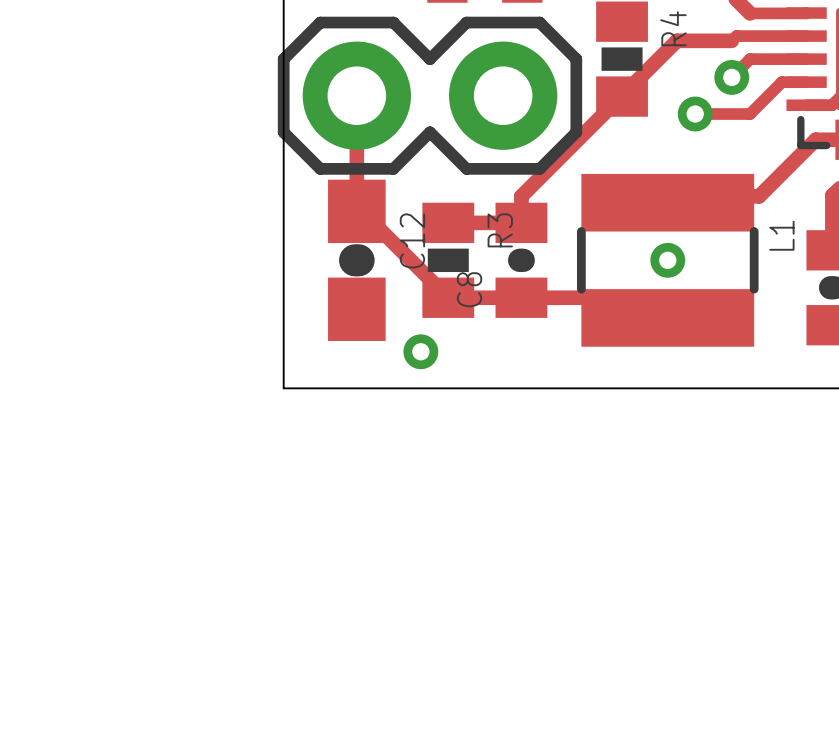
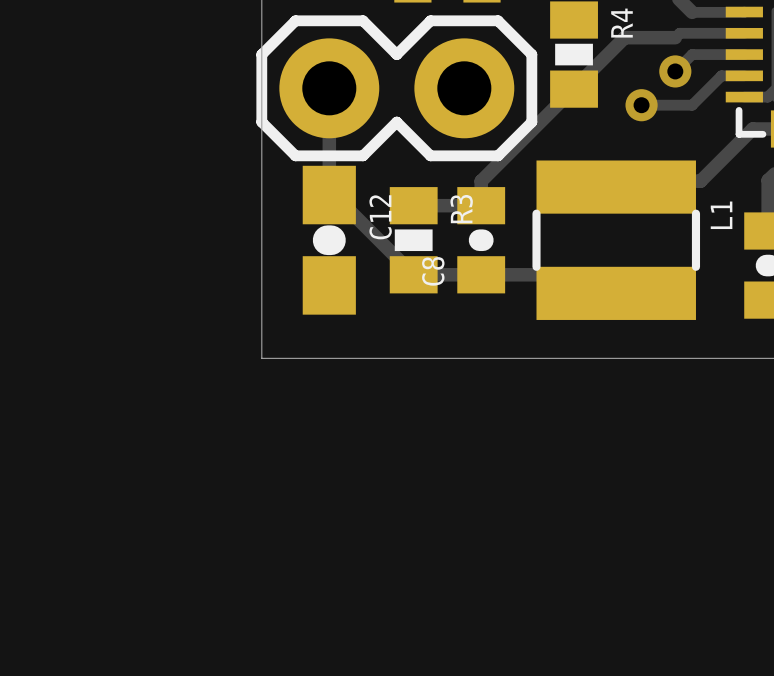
via: (667, 260) -> none
via: (420, 351) -> none

